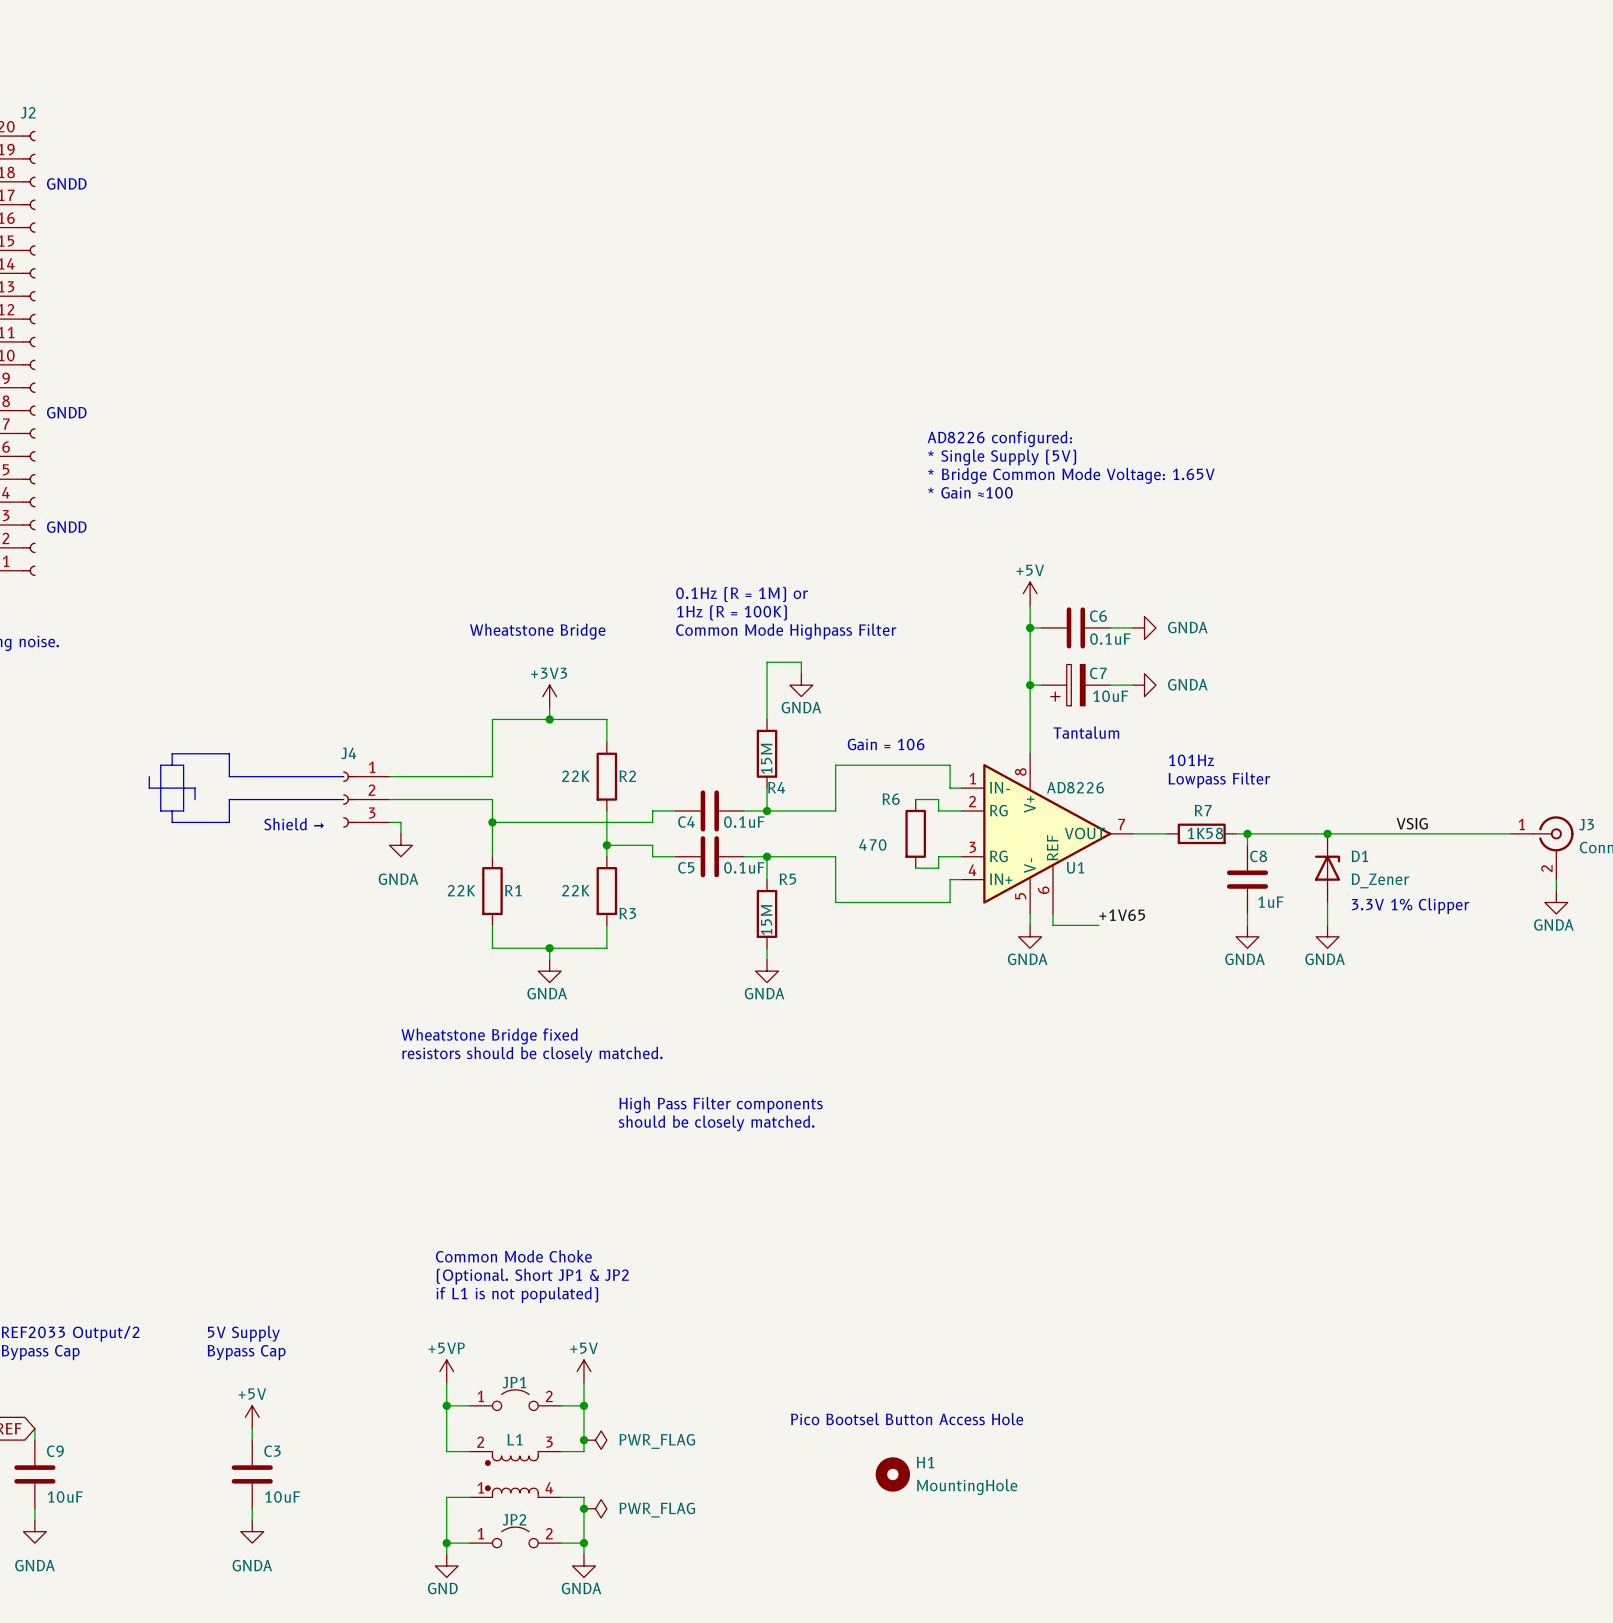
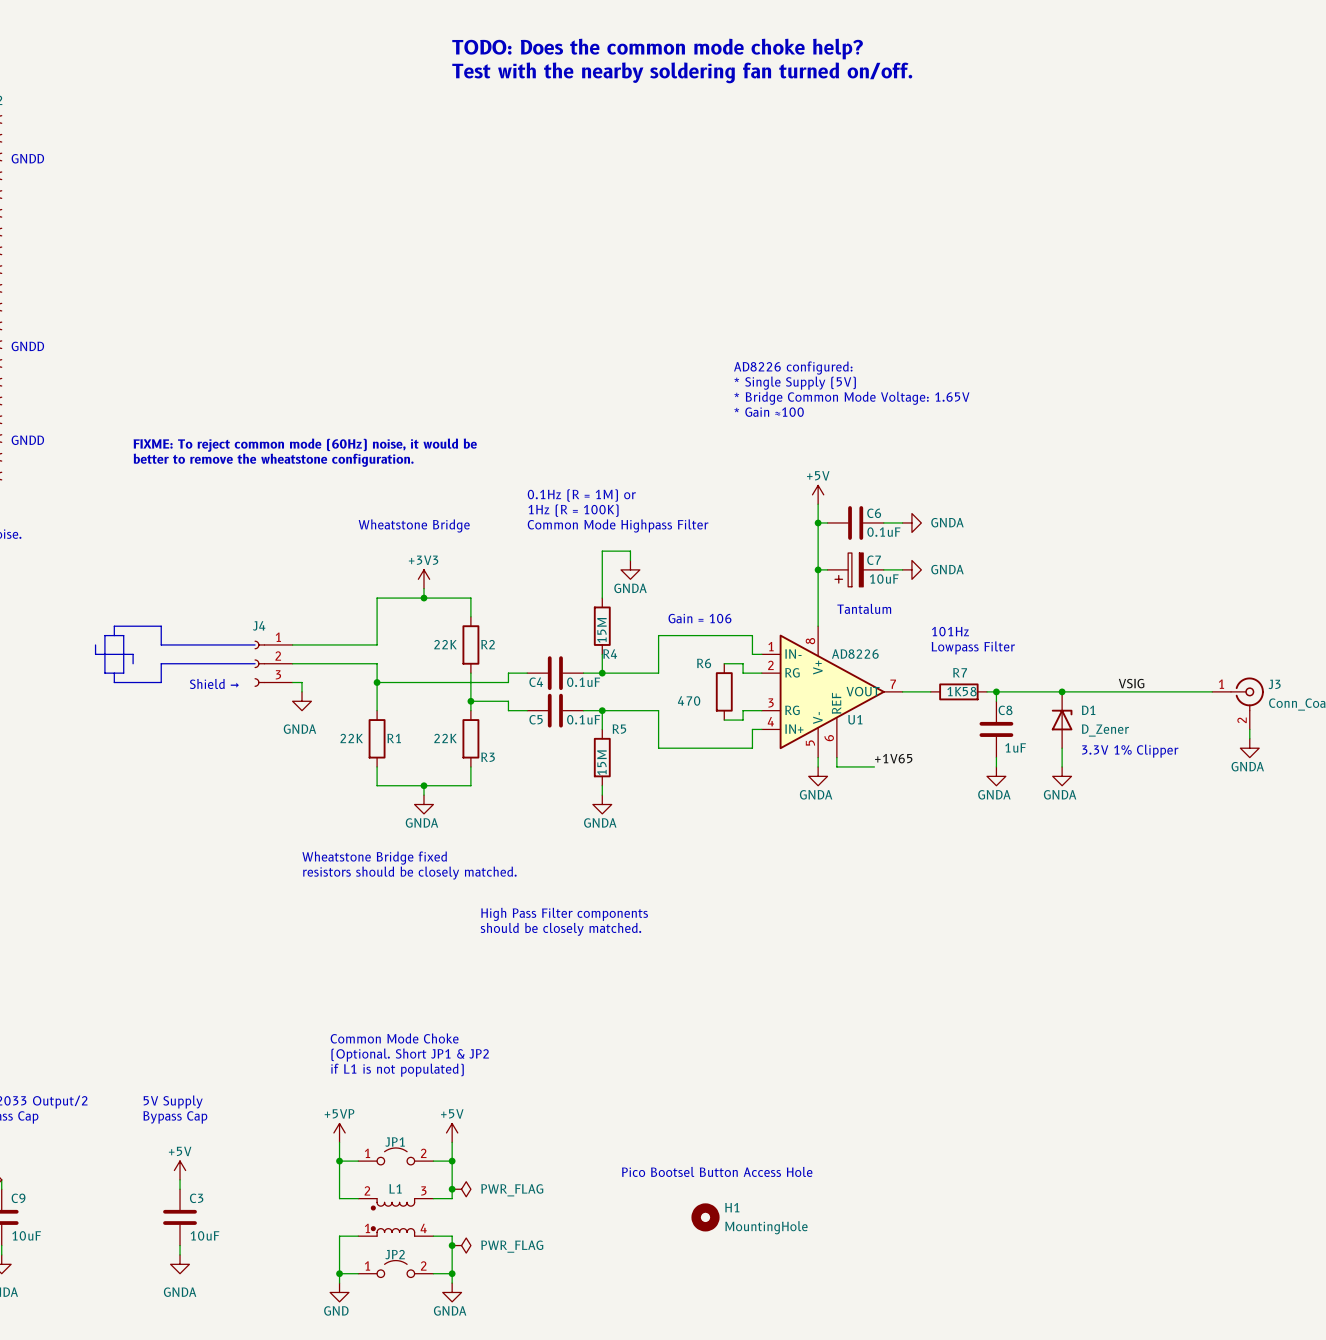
text: none -> TODO: Does the common mode choke help? (657, 49)
text: none -> Test with the nearby soldering fan turned on/off. (682, 72)
text: none -> FIXME: To reject common mode (60Hz) noise, it would be (305, 445)
text: none -> better to remove the wheatstone configuration. (273, 460)

